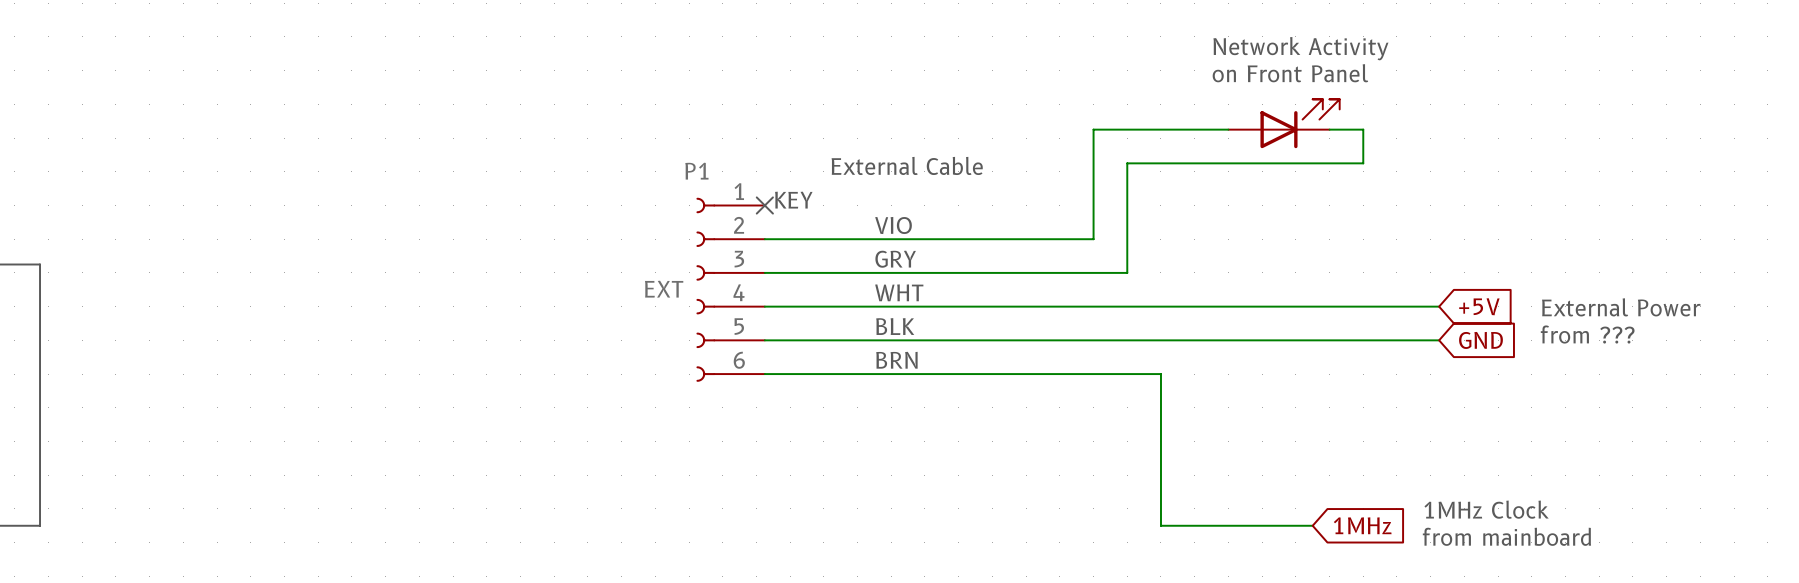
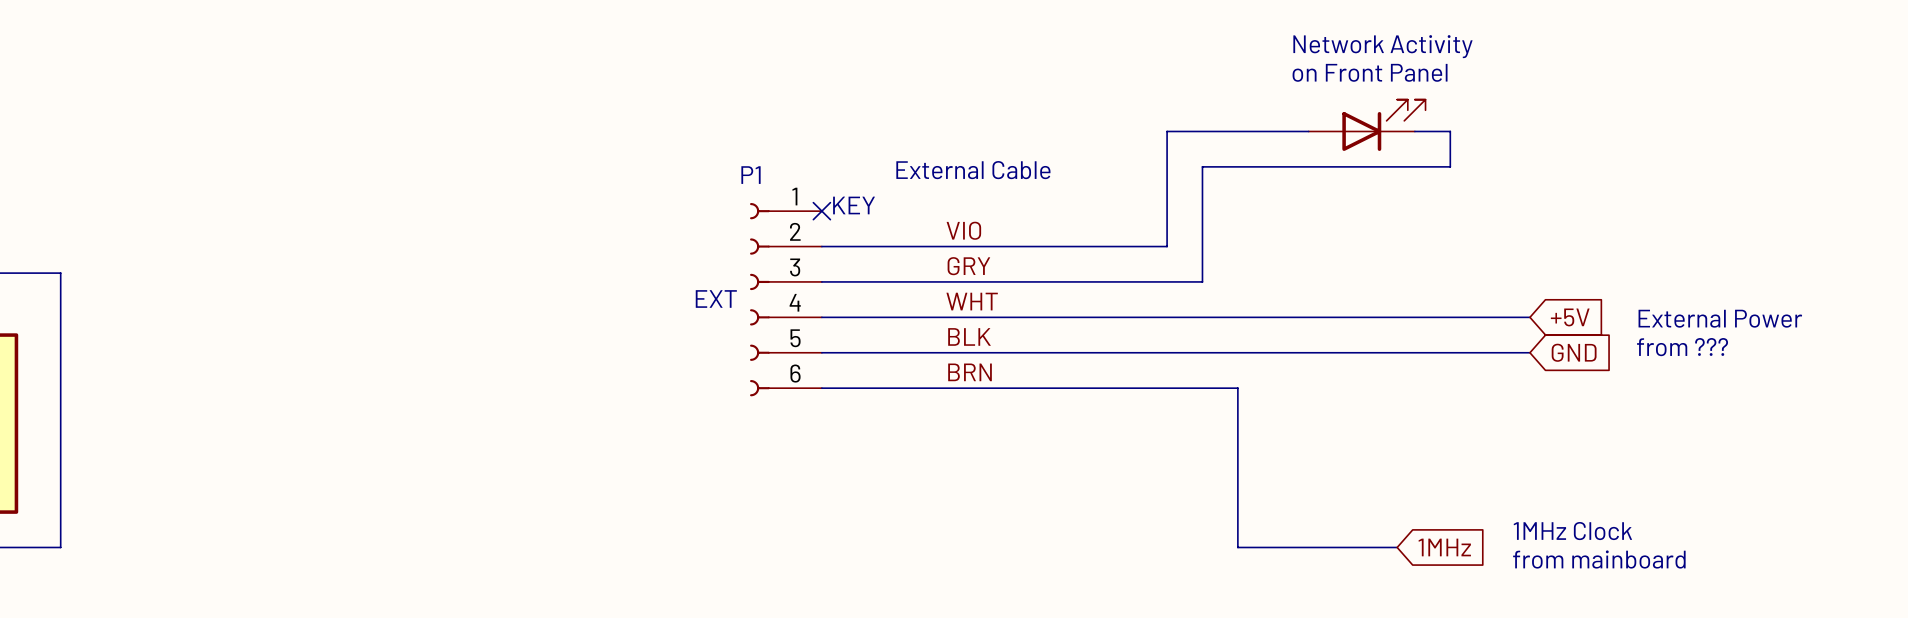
label: none -> VIO (963, 230)
text: VIO (893, 225) -> none
label: none -> GRY (968, 266)
text: GRY (895, 259) -> none
label: none -> WHT (972, 301)
text: WHT (899, 292) -> none
label: none -> BLK (969, 336)
text: BLK (895, 326) -> none
label: none -> BRN (970, 372)
text: BRN (896, 360) -> none

